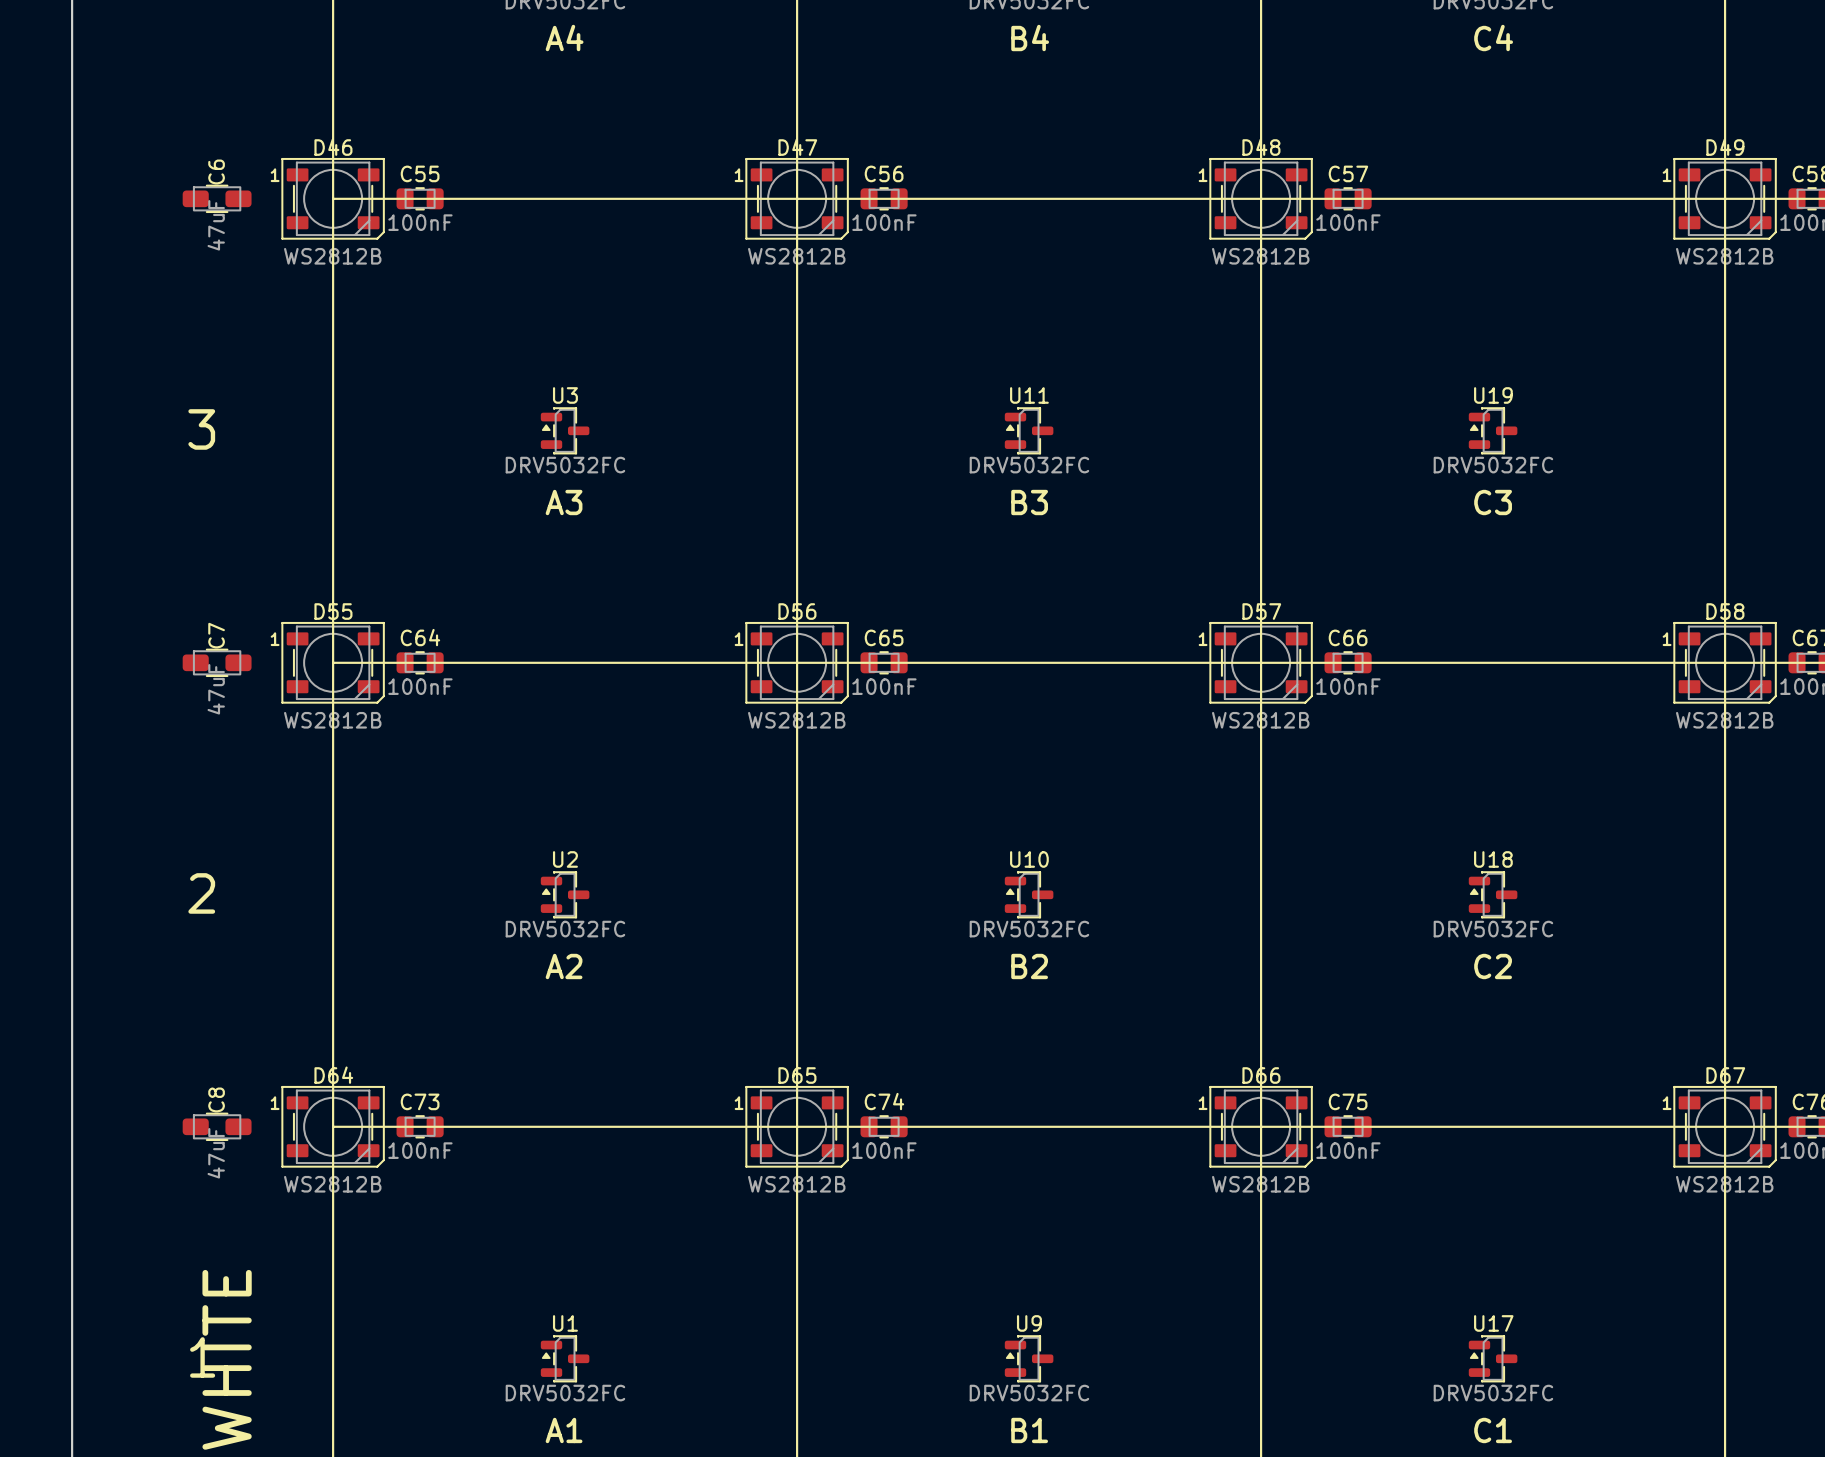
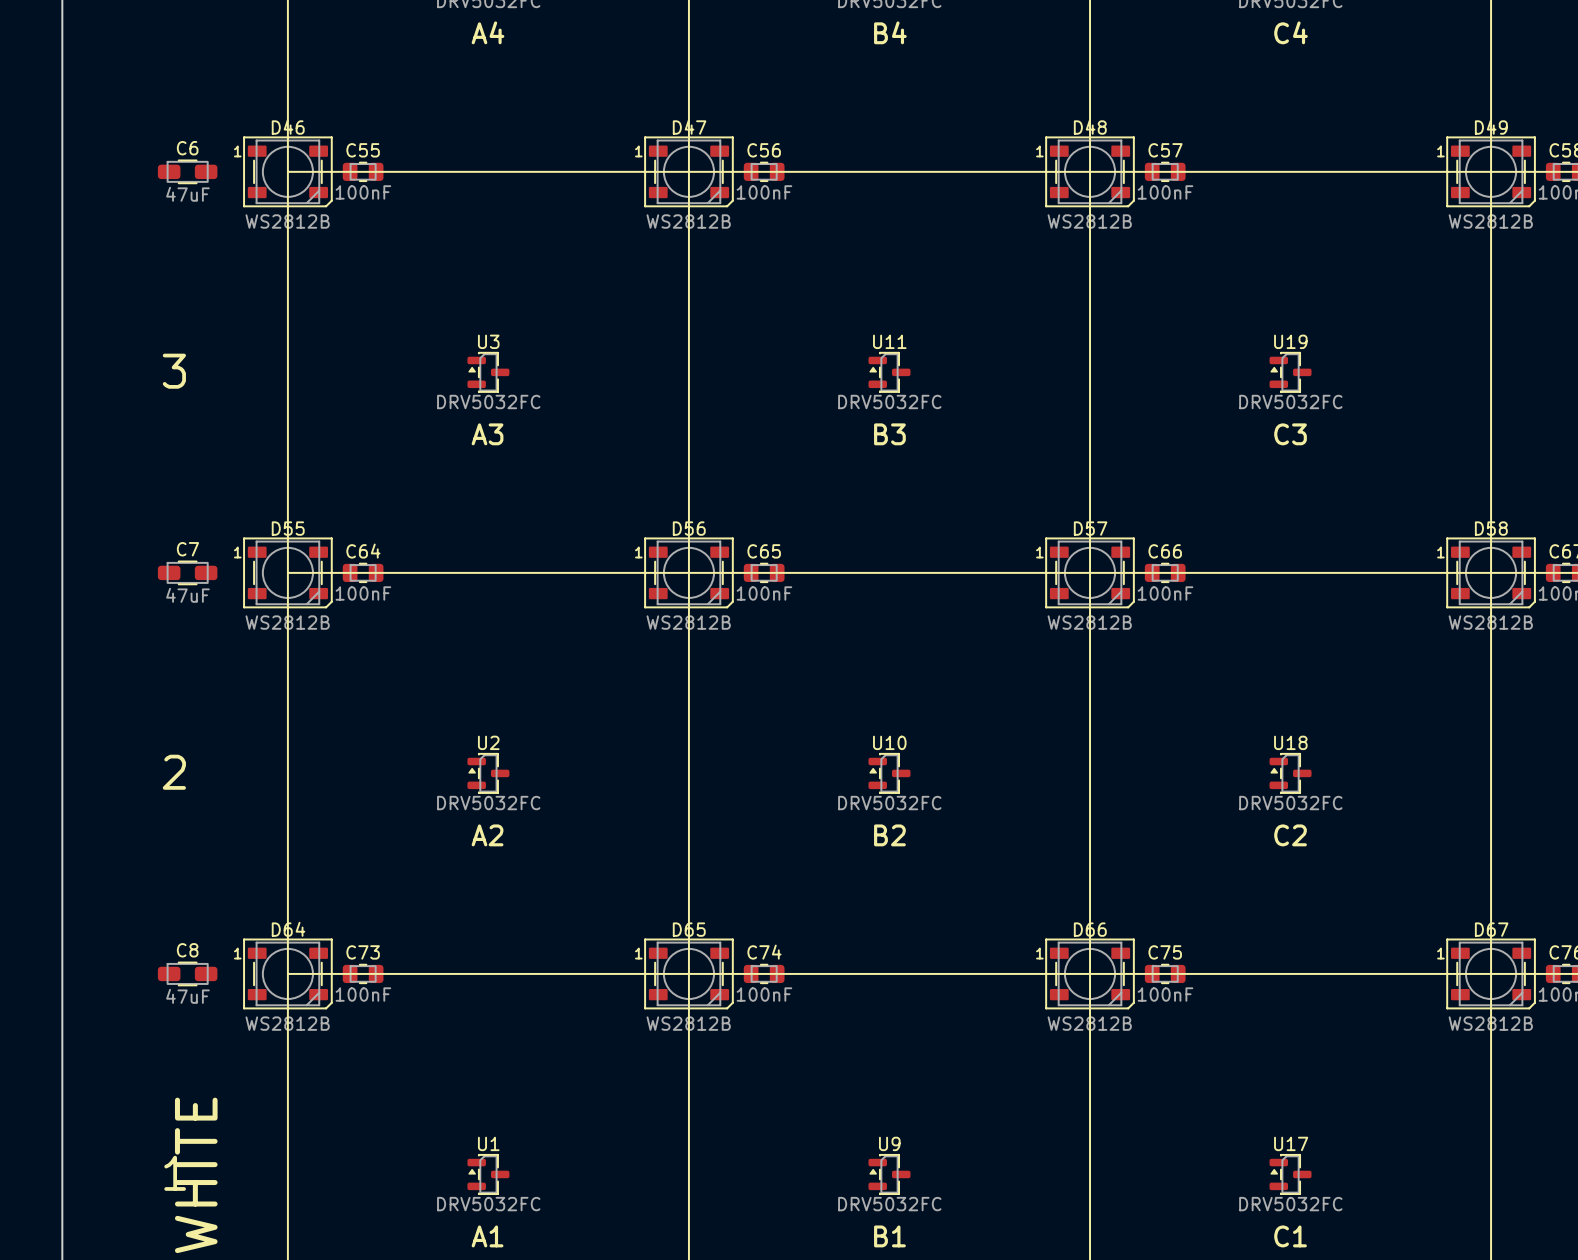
C6 name rotation: 0° (216, 172) -> 90° clockwise (187, 148)
C6 value rotation: 0° (216, 225) -> 90° clockwise (187, 194)
C7 name rotation: 0° (216, 635) -> 90° clockwise (187, 549)
C7 value rotation: 0° (216, 689) -> 90° clockwise (187, 595)
C8 name rotation: 0° (216, 1099) -> 90° clockwise (187, 950)
C8 value rotation: 0° (216, 1153) -> 90° clockwise (187, 996)

